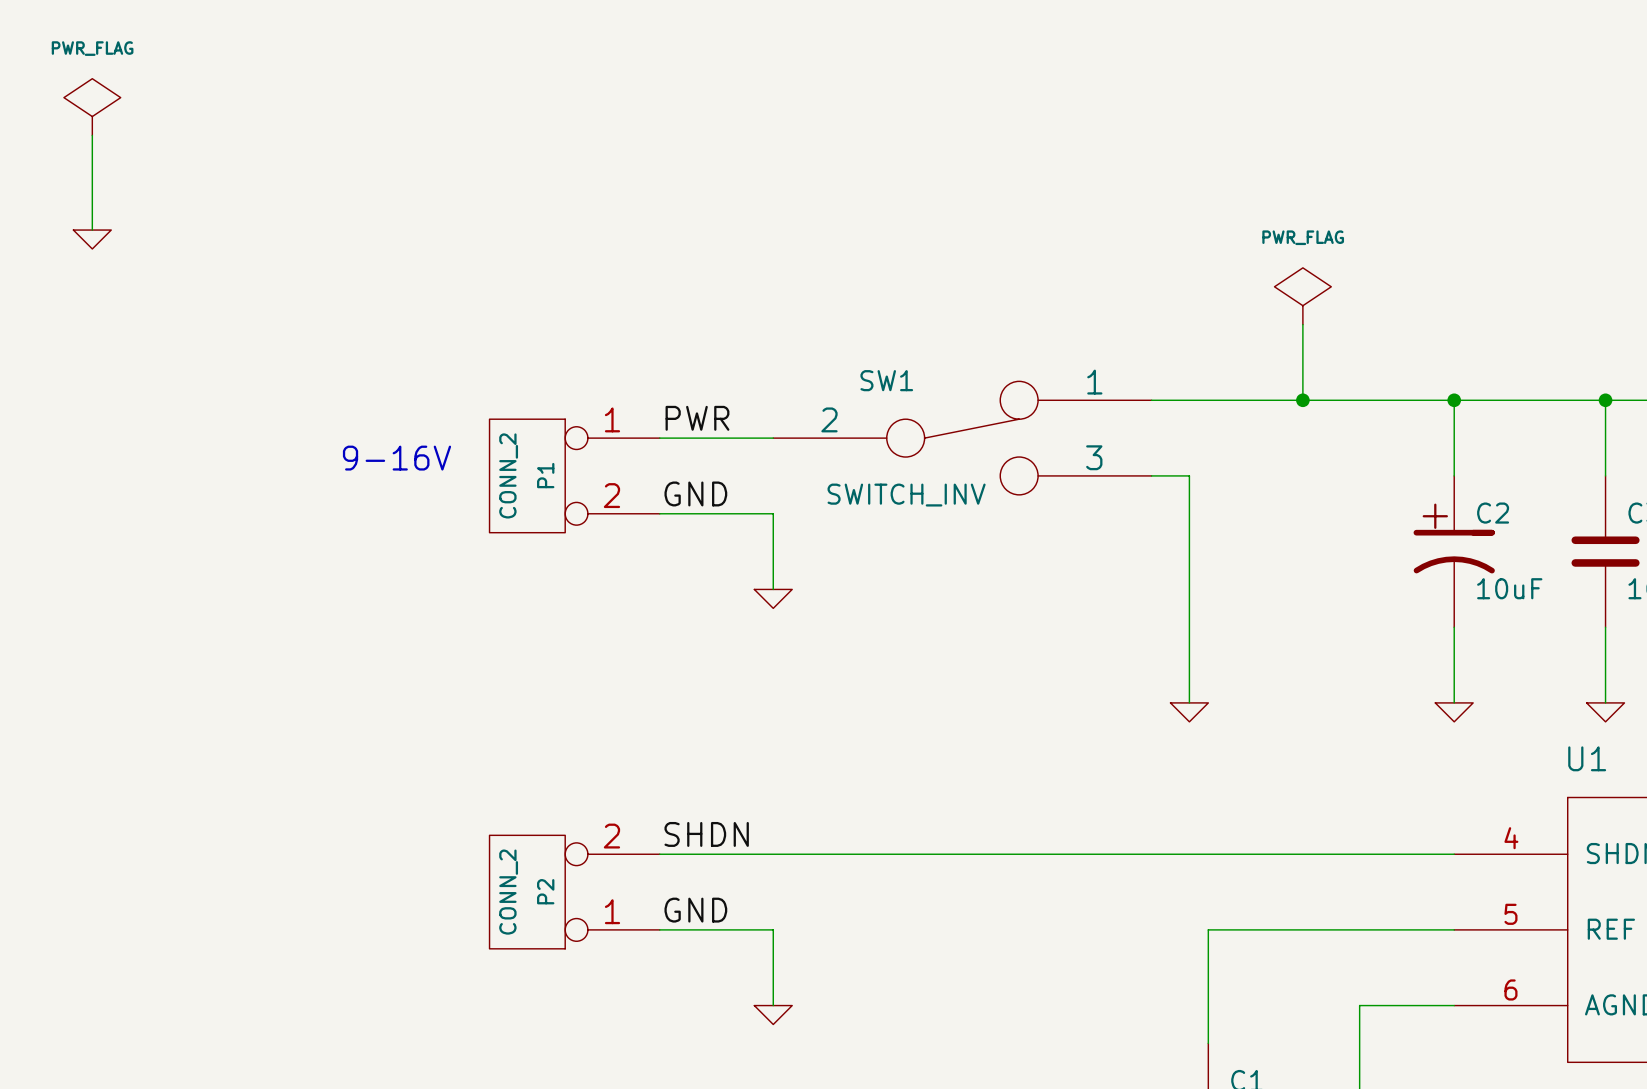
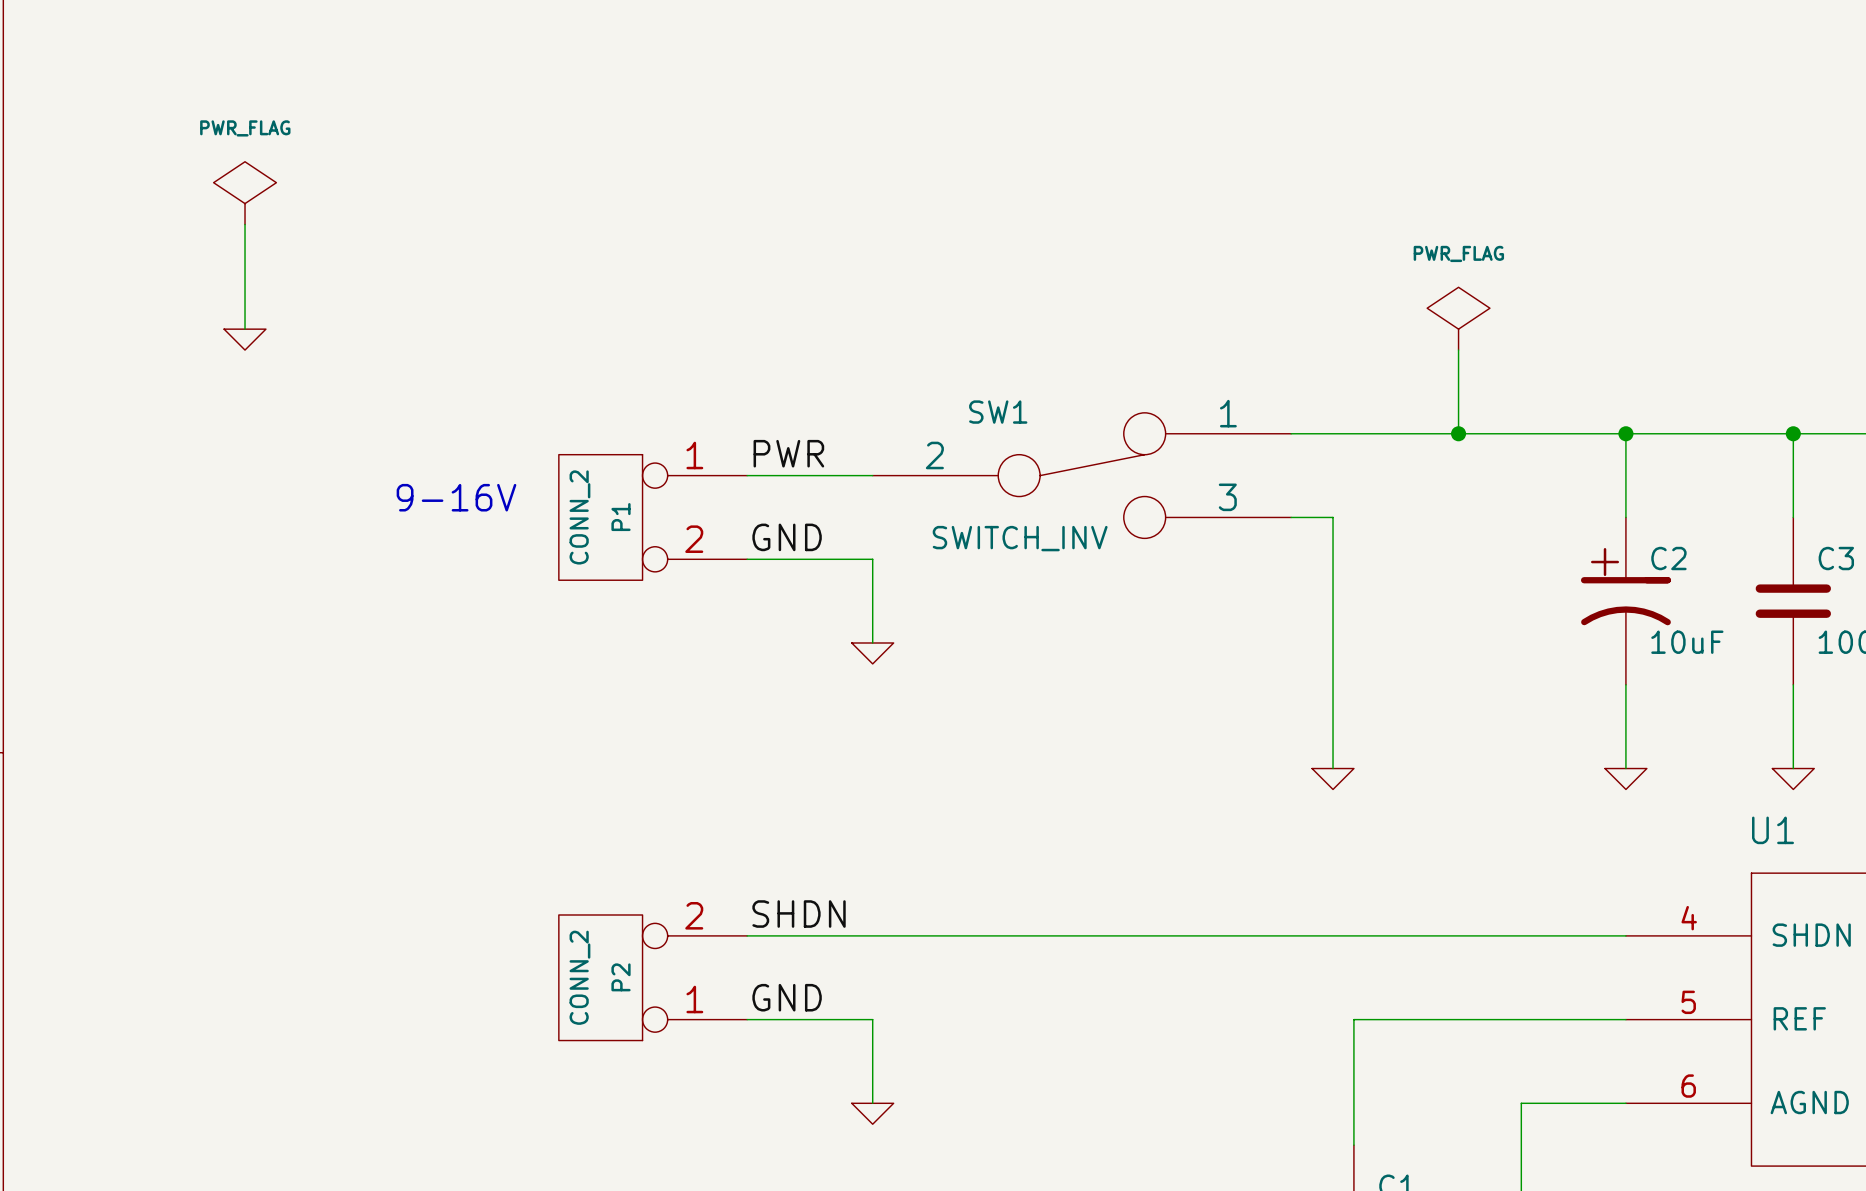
power symbol position: PWR_FLAG (92, 107) -> PWR_FLAG (245, 193)
wire: (92, 135) (92, 230) -> (245, 224) (245, 329)
power symbol position: (92, 239) -> (245, 339)

